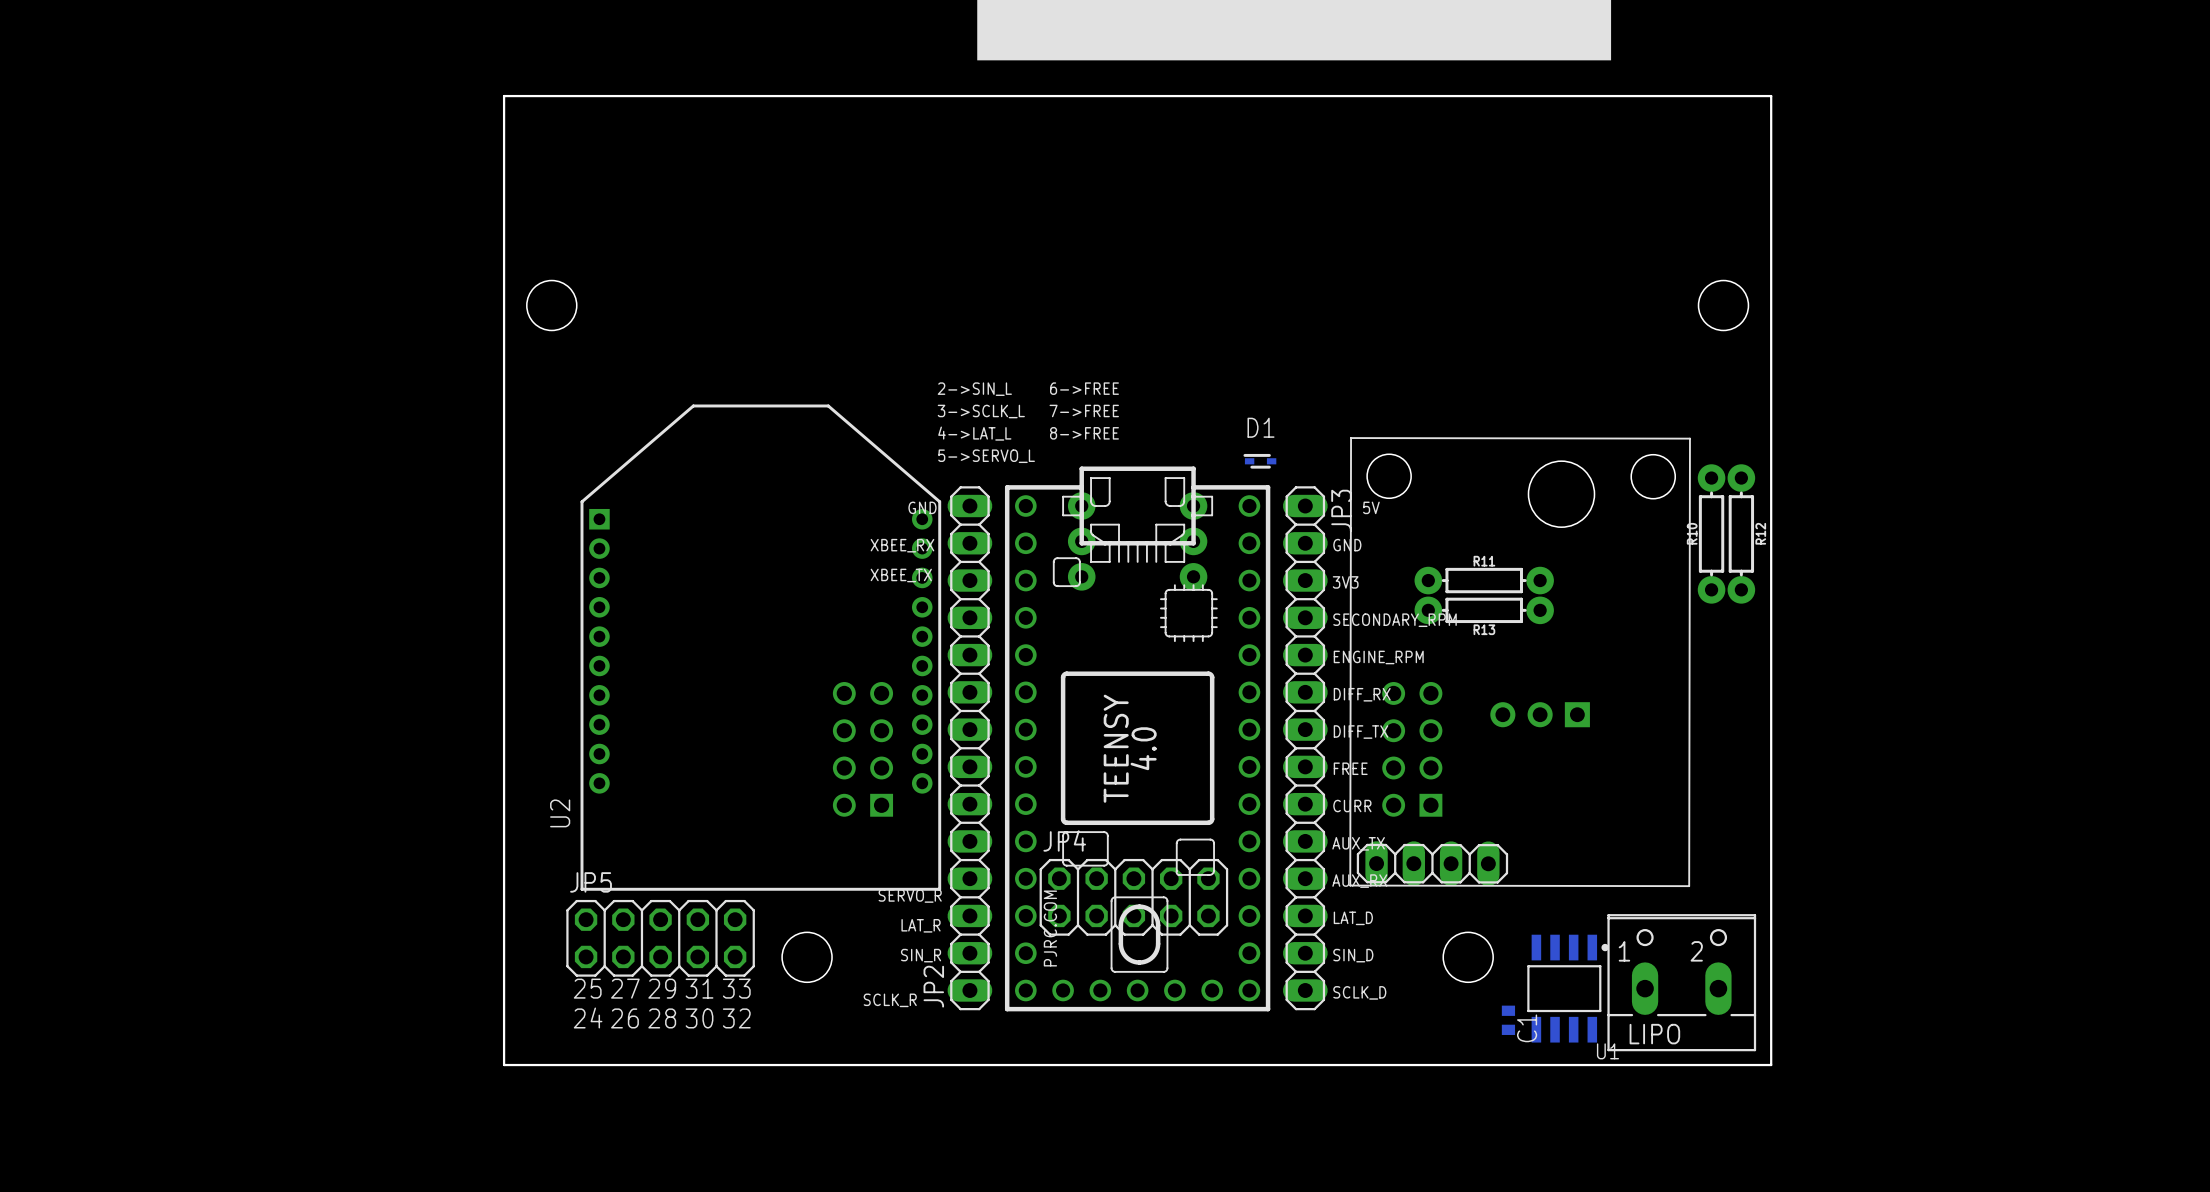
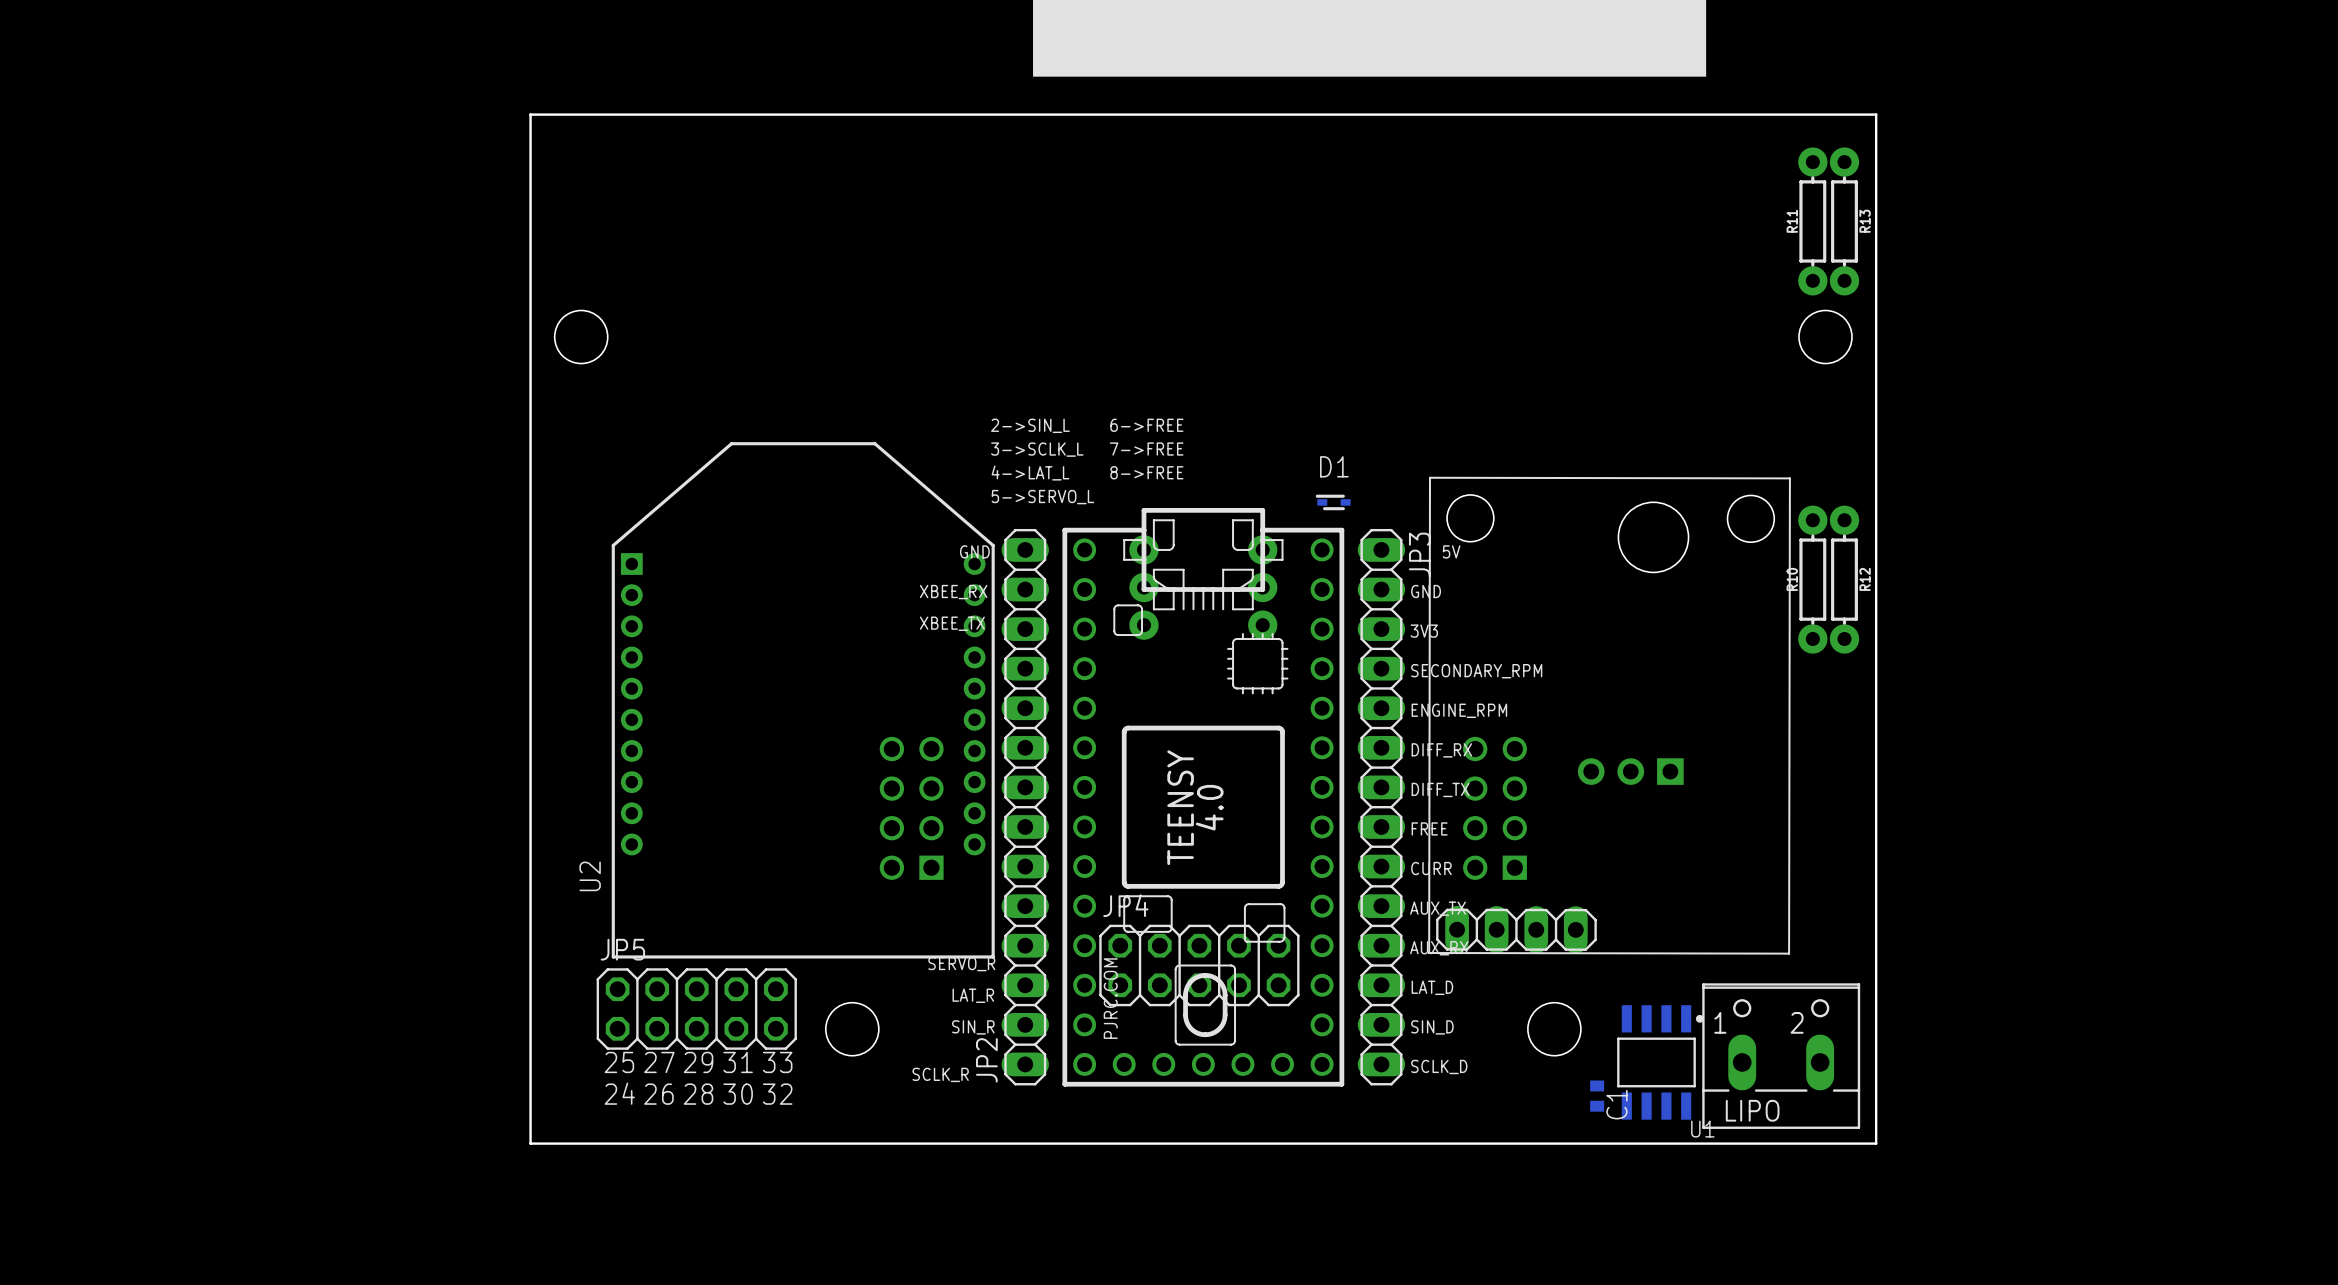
R11 rotation: 0° (1484, 580) -> 90° clockwise (1812, 221)
R11 position: (1484, 580) -> (1812, 221)
R13 rotation: 0° (1484, 610) -> 90° clockwise (1844, 221)
R13 position: (1484, 610) -> (1844, 221)

